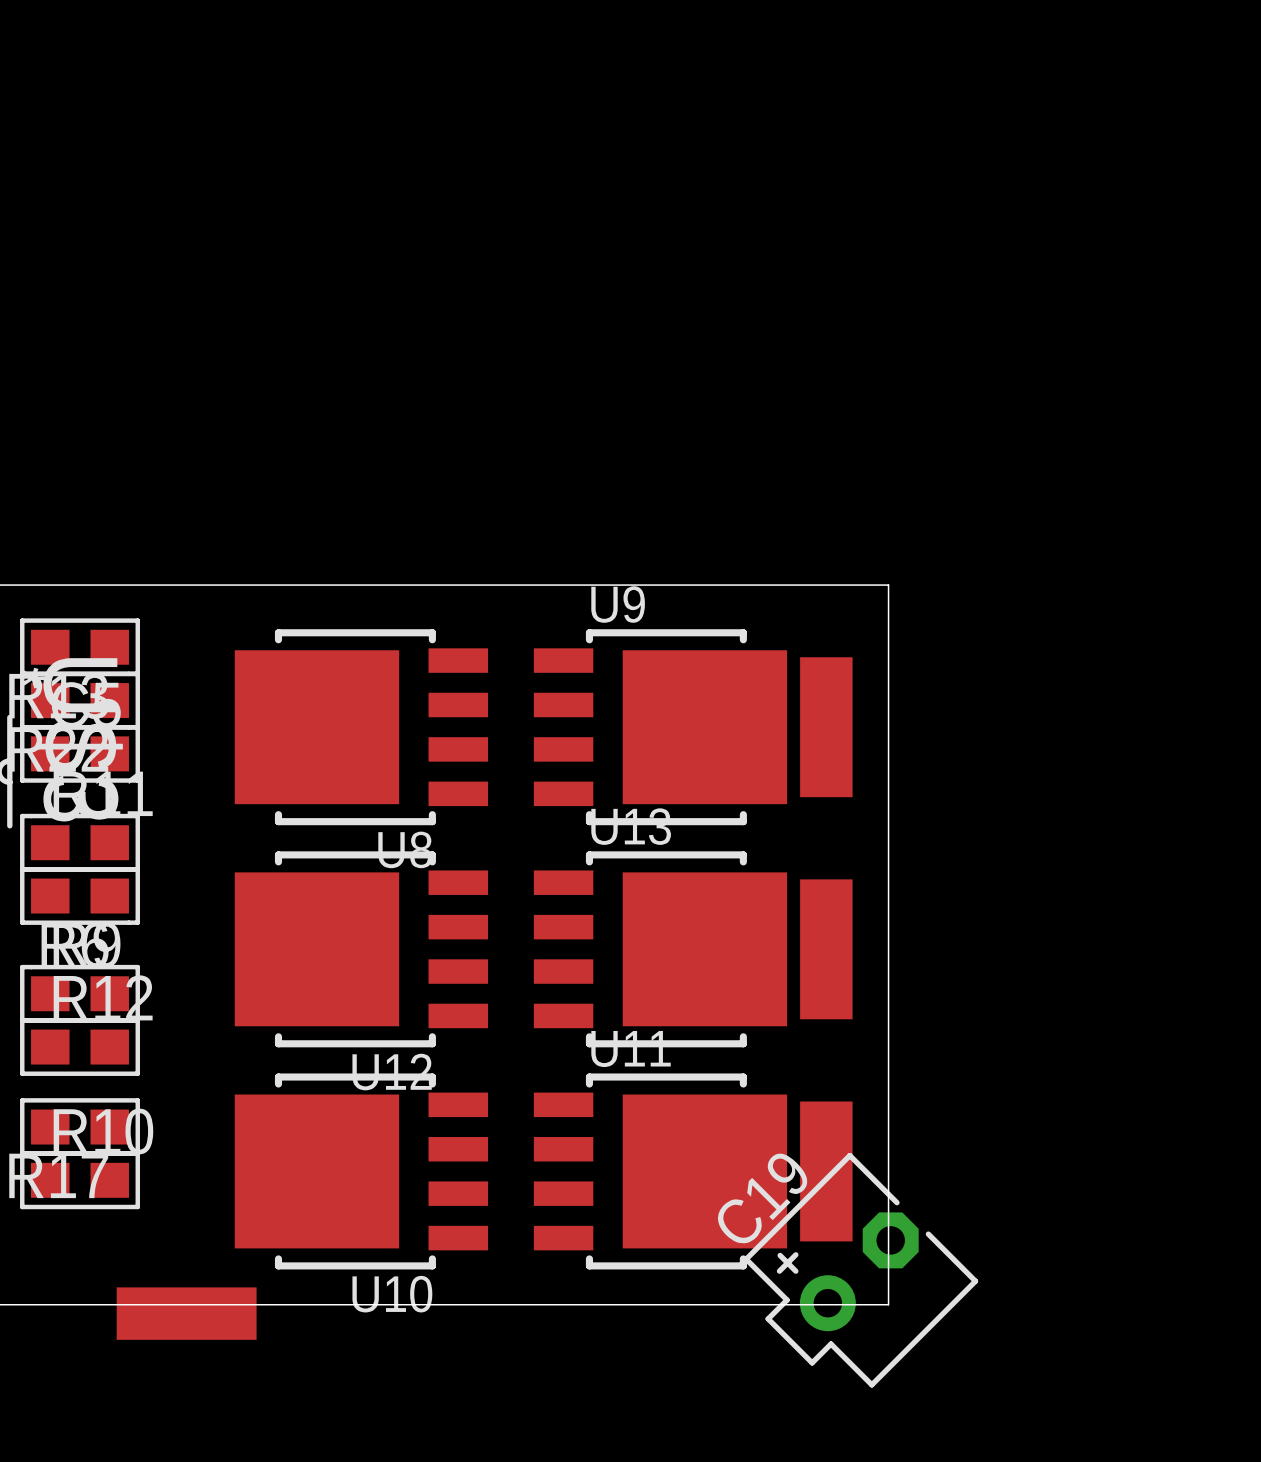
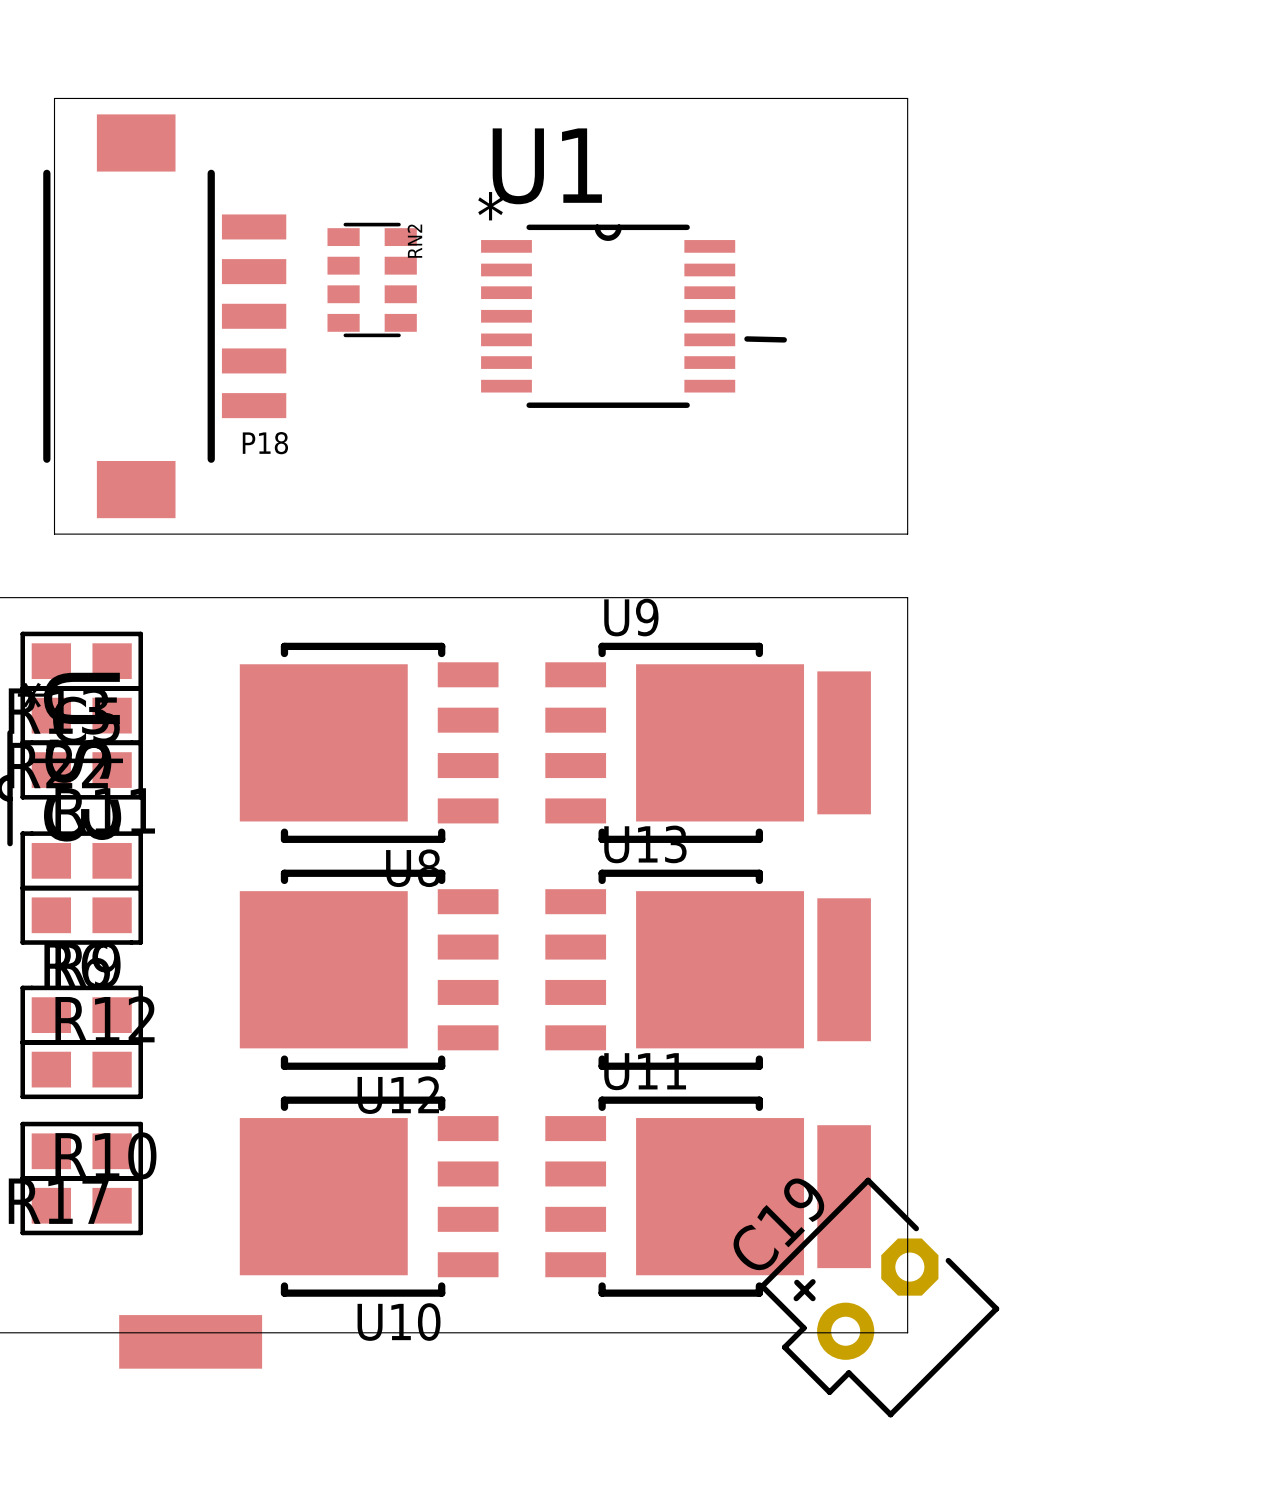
board edge: none -> (54, 98) (907, 98) (907, 534) (54, 534) (54, 98)
RN2: none -> (372, 279)
P18: none -> (164, 316)
U1: none -> (634, 316)

